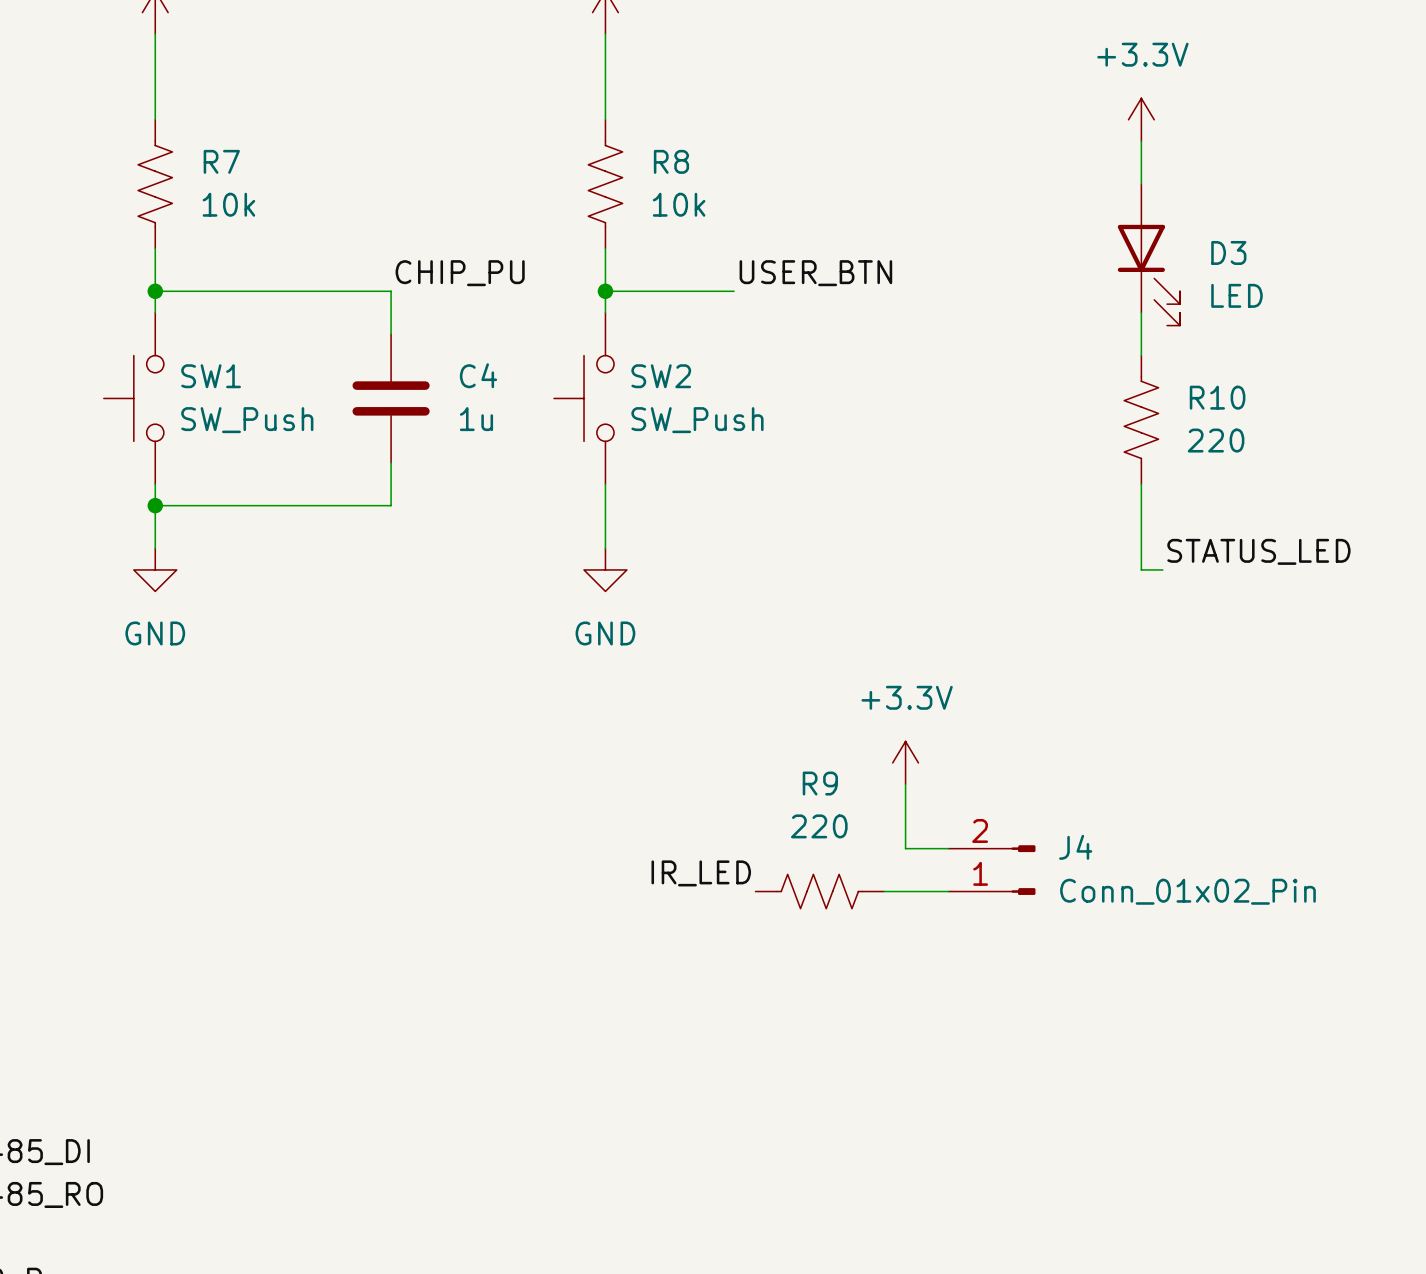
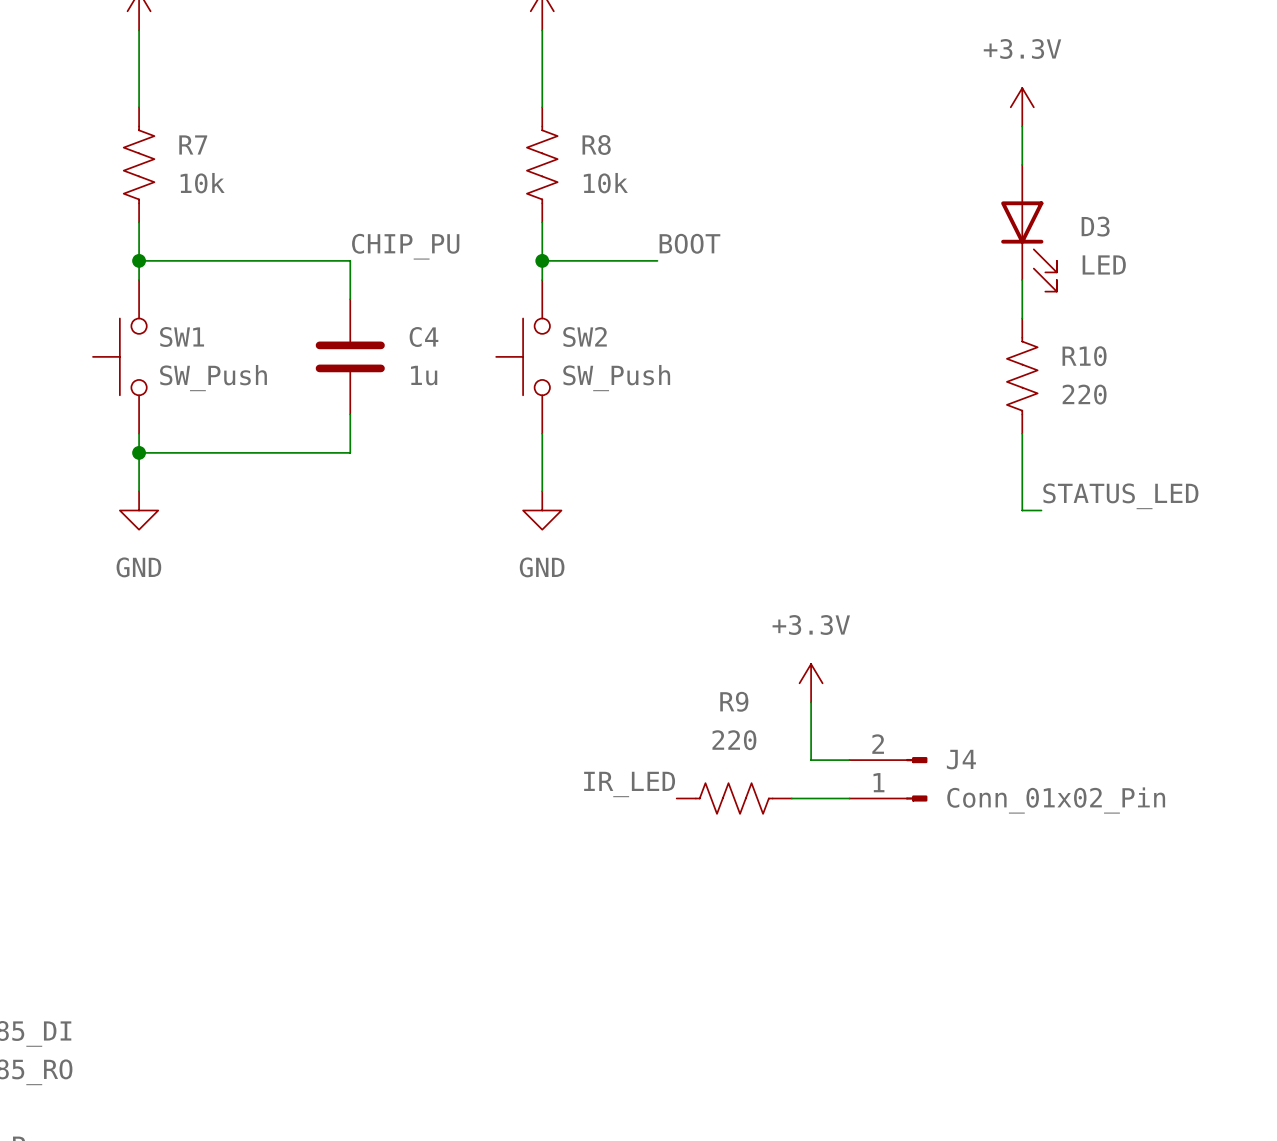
label: USER_BTN (815, 273) -> BOOT (689, 243)

